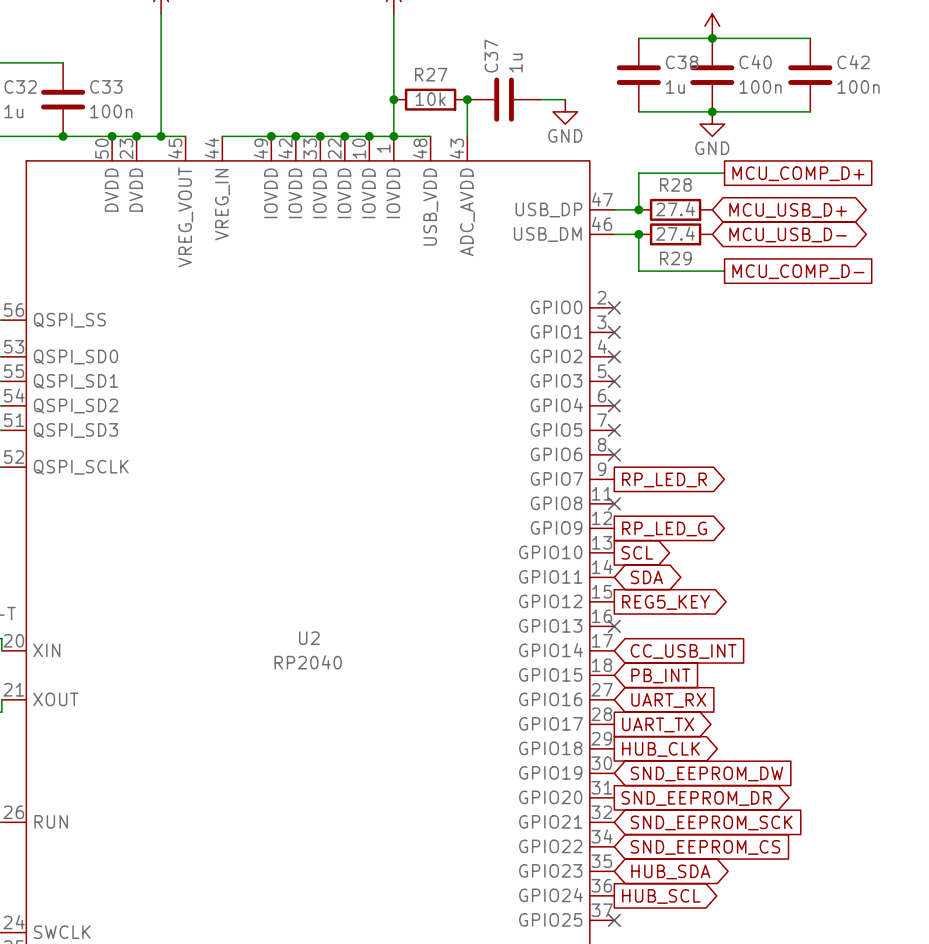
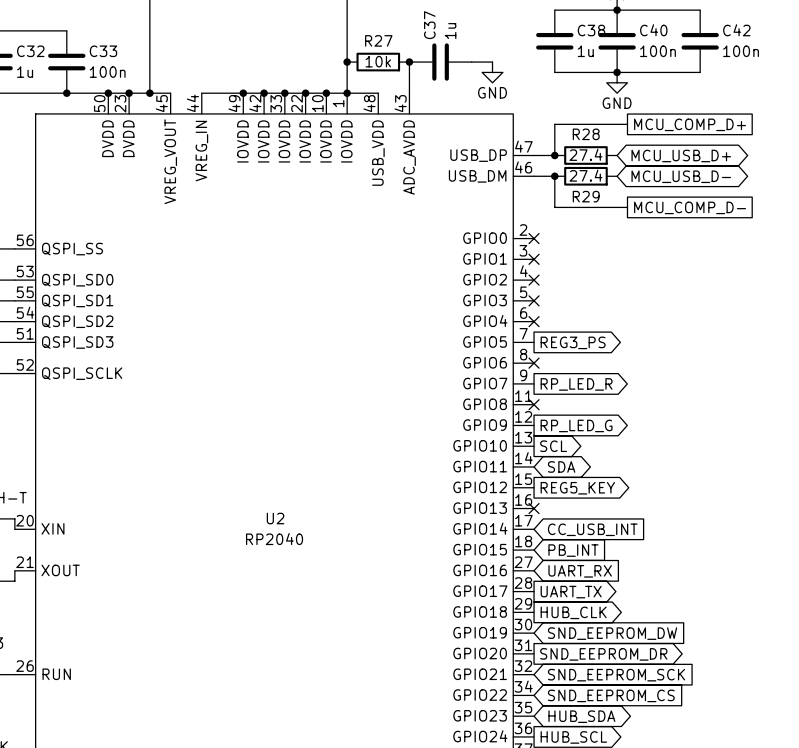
no-connect mark: (614, 430) -> none
global label: none -> REG3_PS (573, 342)

